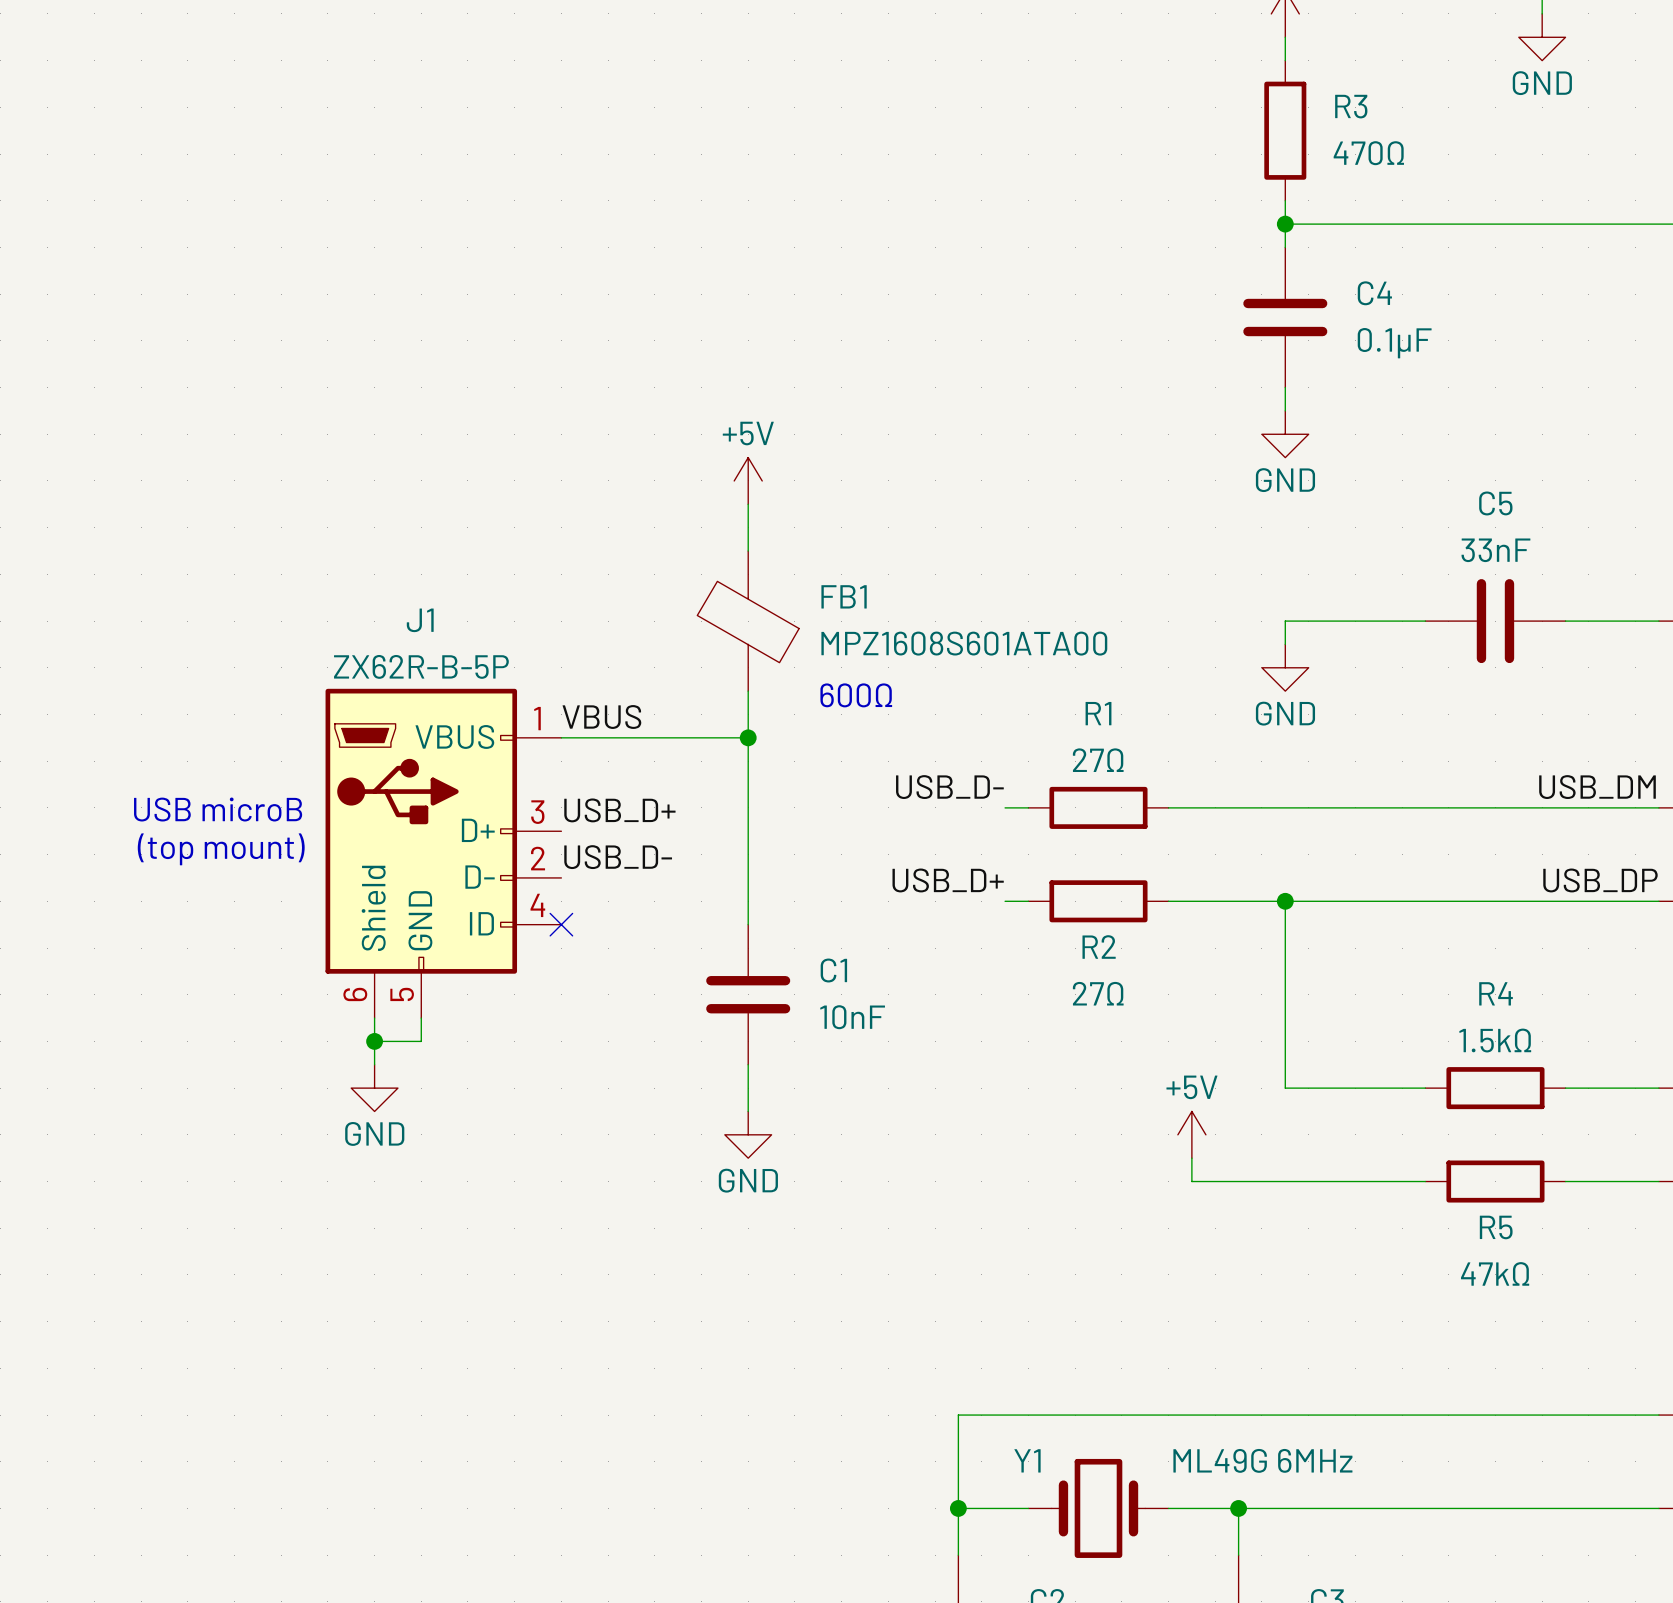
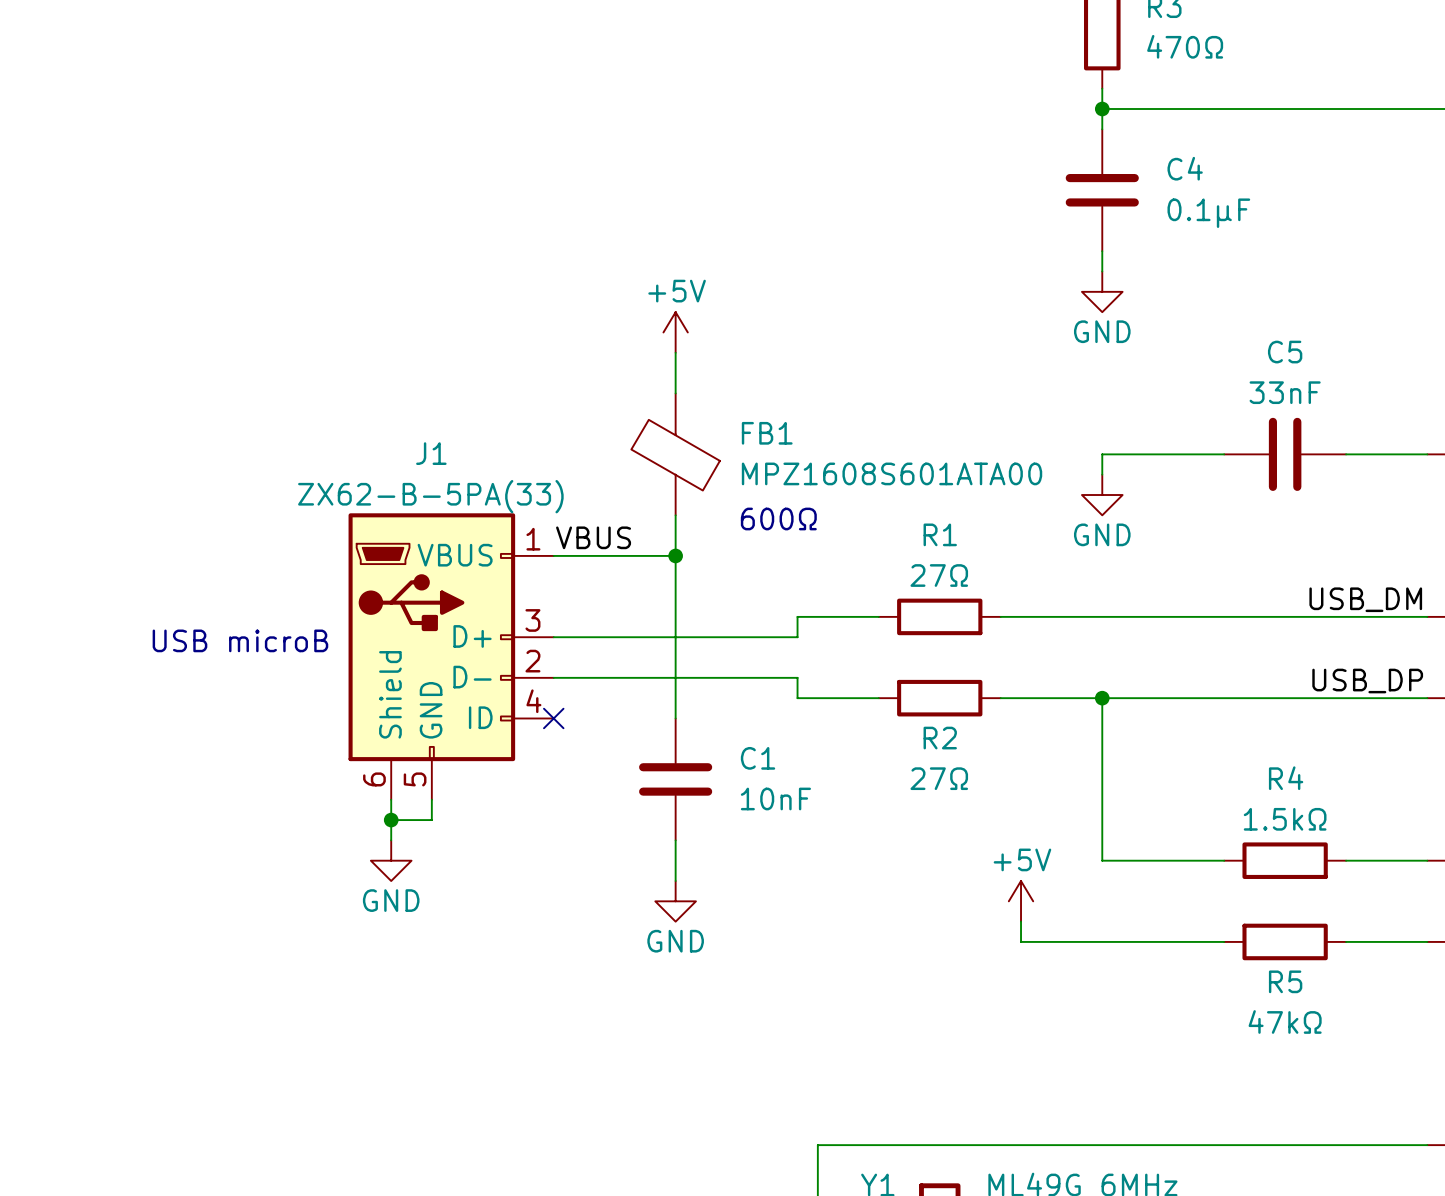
power symbol position: +5V (748, 480) -> +5V (675, 332)
wire: (748, 504) (748, 551) -> (675, 352) (675, 393)
FB1 position: (748, 621) -> (675, 454)
J1 value: ZX62R-B-5P (421, 666) -> ZX62-B-5PA(33) (430, 496)
wire: (748, 691) (748, 924) -> (675, 515) (675, 718)
text position: 600Ω (856, 695) -> 600Ω (778, 518)
label position: VBUS (601, 717) -> VBUS (593, 537)
wire: none -> (635, 555) (675, 555)
junction position: (748, 737) -> (675, 555)
label: USB_D- (949, 787) -> none
wire: none -> (858, 616) (797, 616) (797, 637) (553, 637)
text position: USB microB (218, 809) -> USB microB (240, 640)
label: USB_D+ (619, 810) -> none
text: (top mount) (221, 849) -> none
J1 position: (443, 853) -> (451, 656)
label: USB_D- (618, 857) -> none
wire: none -> (553, 677) (797, 677) (797, 698) (858, 698)
label: USB_D+ (948, 880) -> none
no-connect mark position: (561, 924) -> (553, 718)
C1 position: (748, 994) -> (675, 779)
wire: (374, 1018) (374, 1064) -> (391, 799) (391, 840)
wire: (421, 1018) (421, 1041) (374, 1041) -> (431, 799) (431, 820) (391, 820)
junction position: (374, 1041) -> (391, 820)
wire: (748, 1064) (748, 1111) -> (675, 840) (675, 881)
power symbol position: GND (374, 1088) -> GND (391, 860)
power symbol position: GND (748, 1134) -> GND (675, 901)

